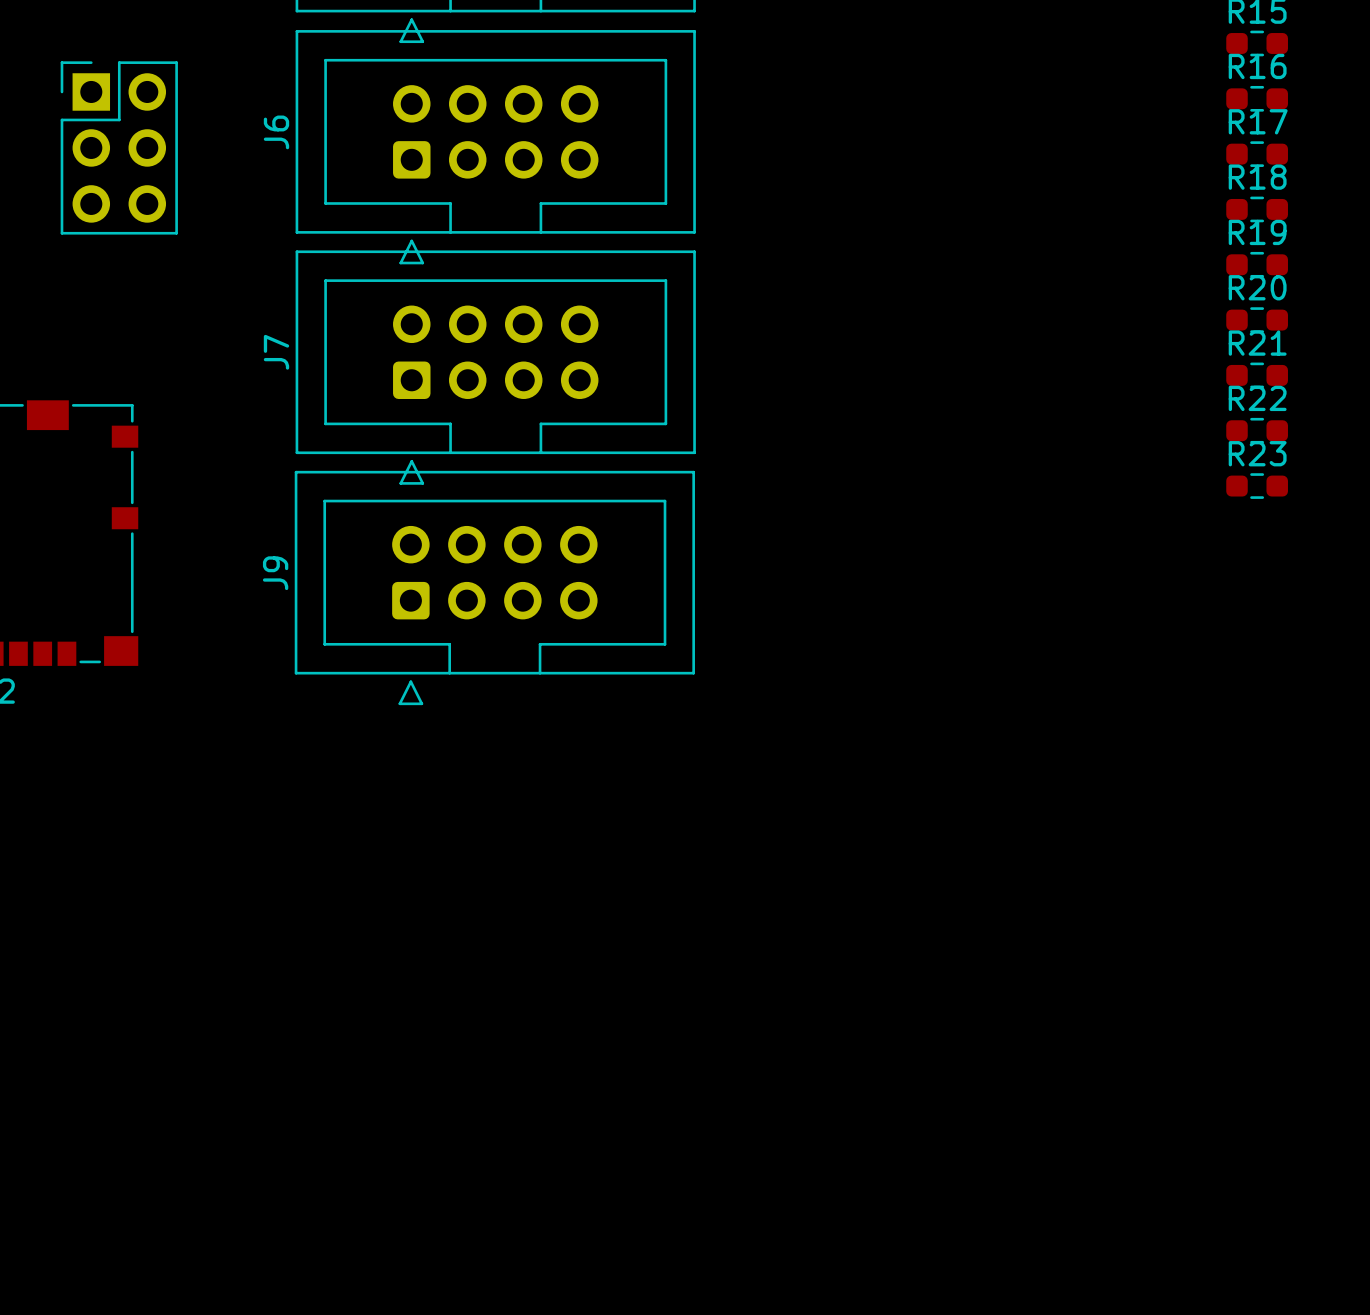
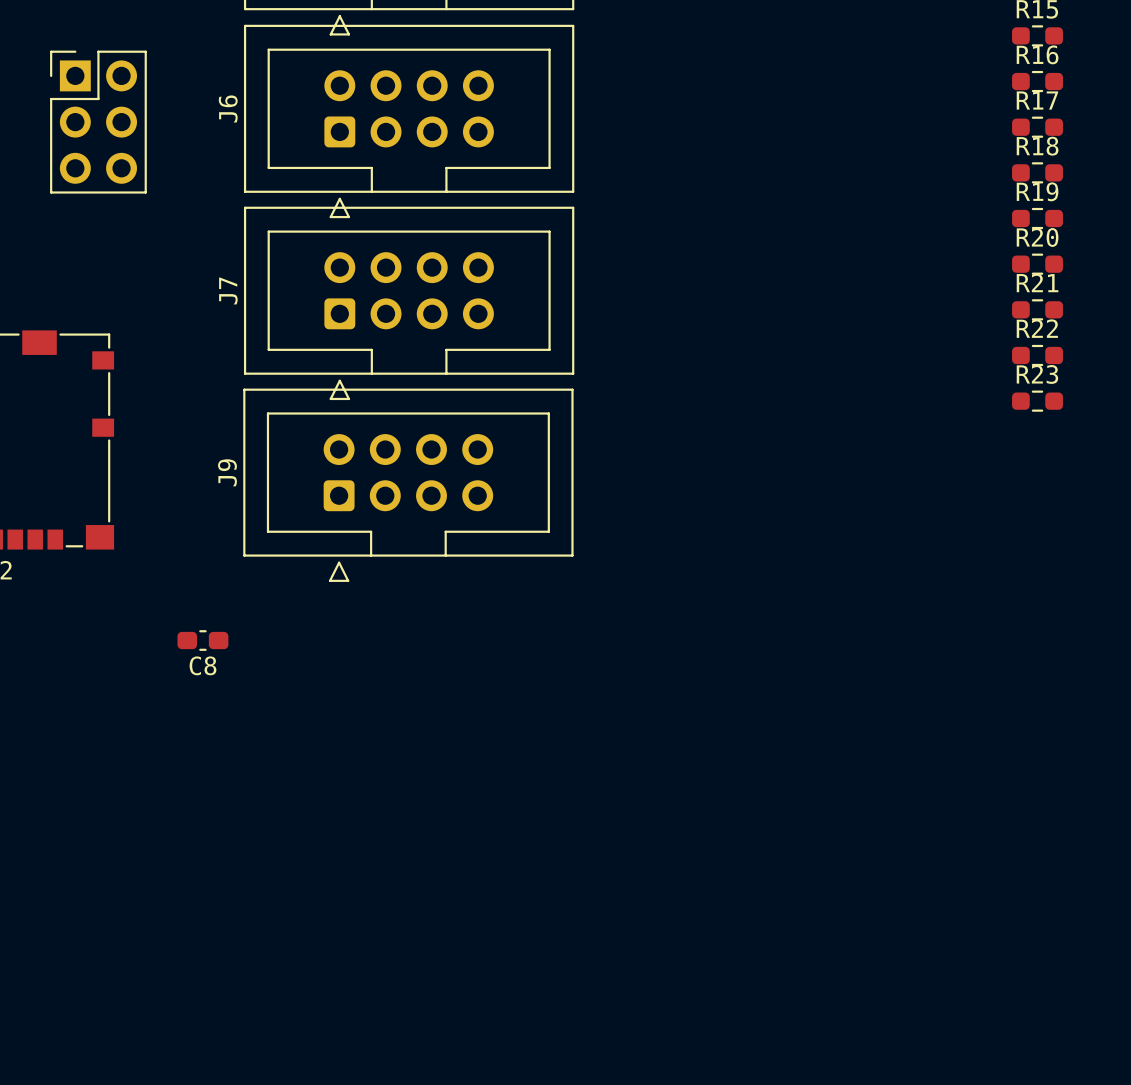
C8: none -> (202, 640)

